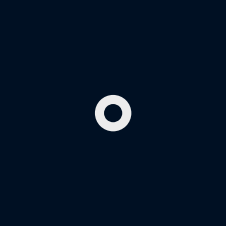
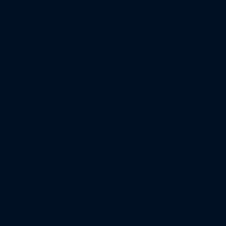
via: (113, 113) -> none

